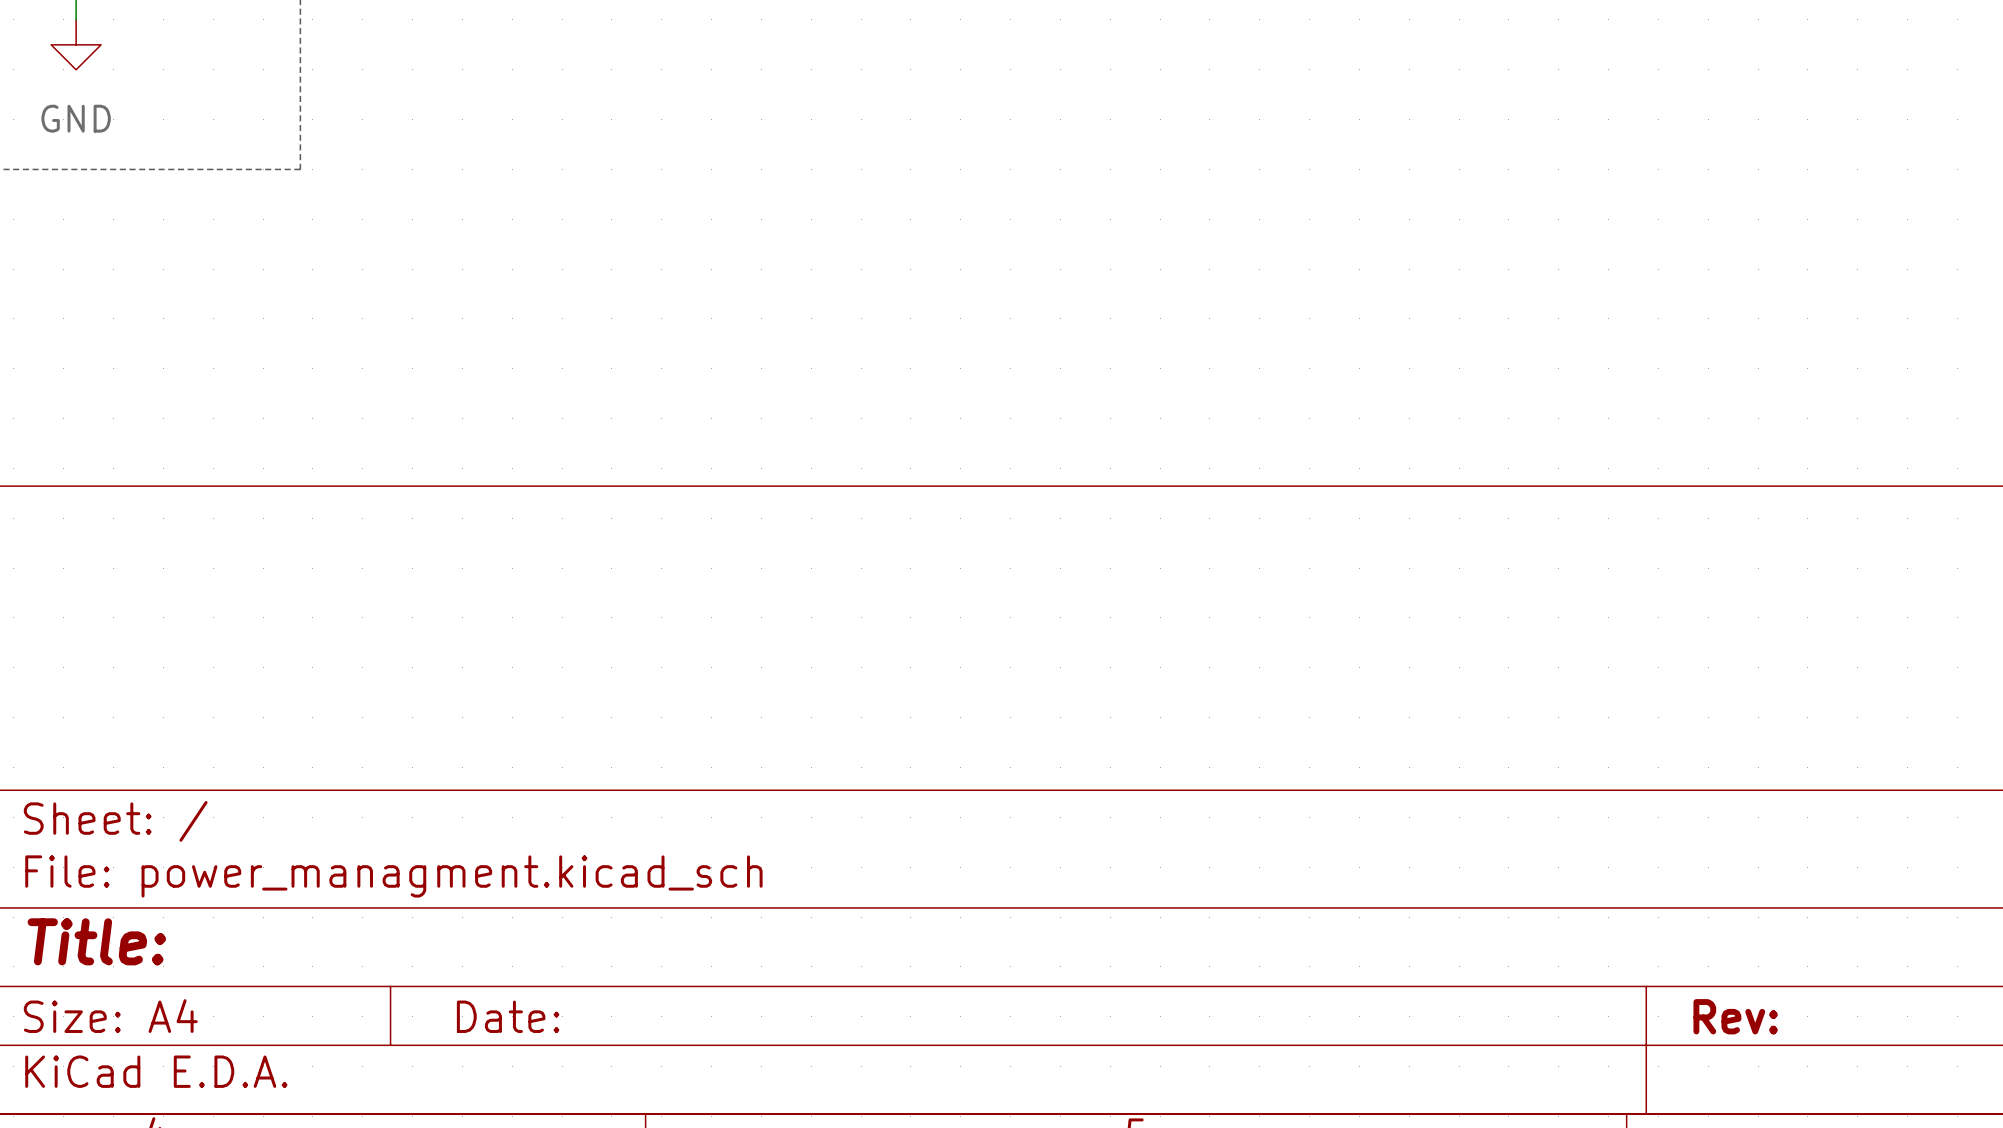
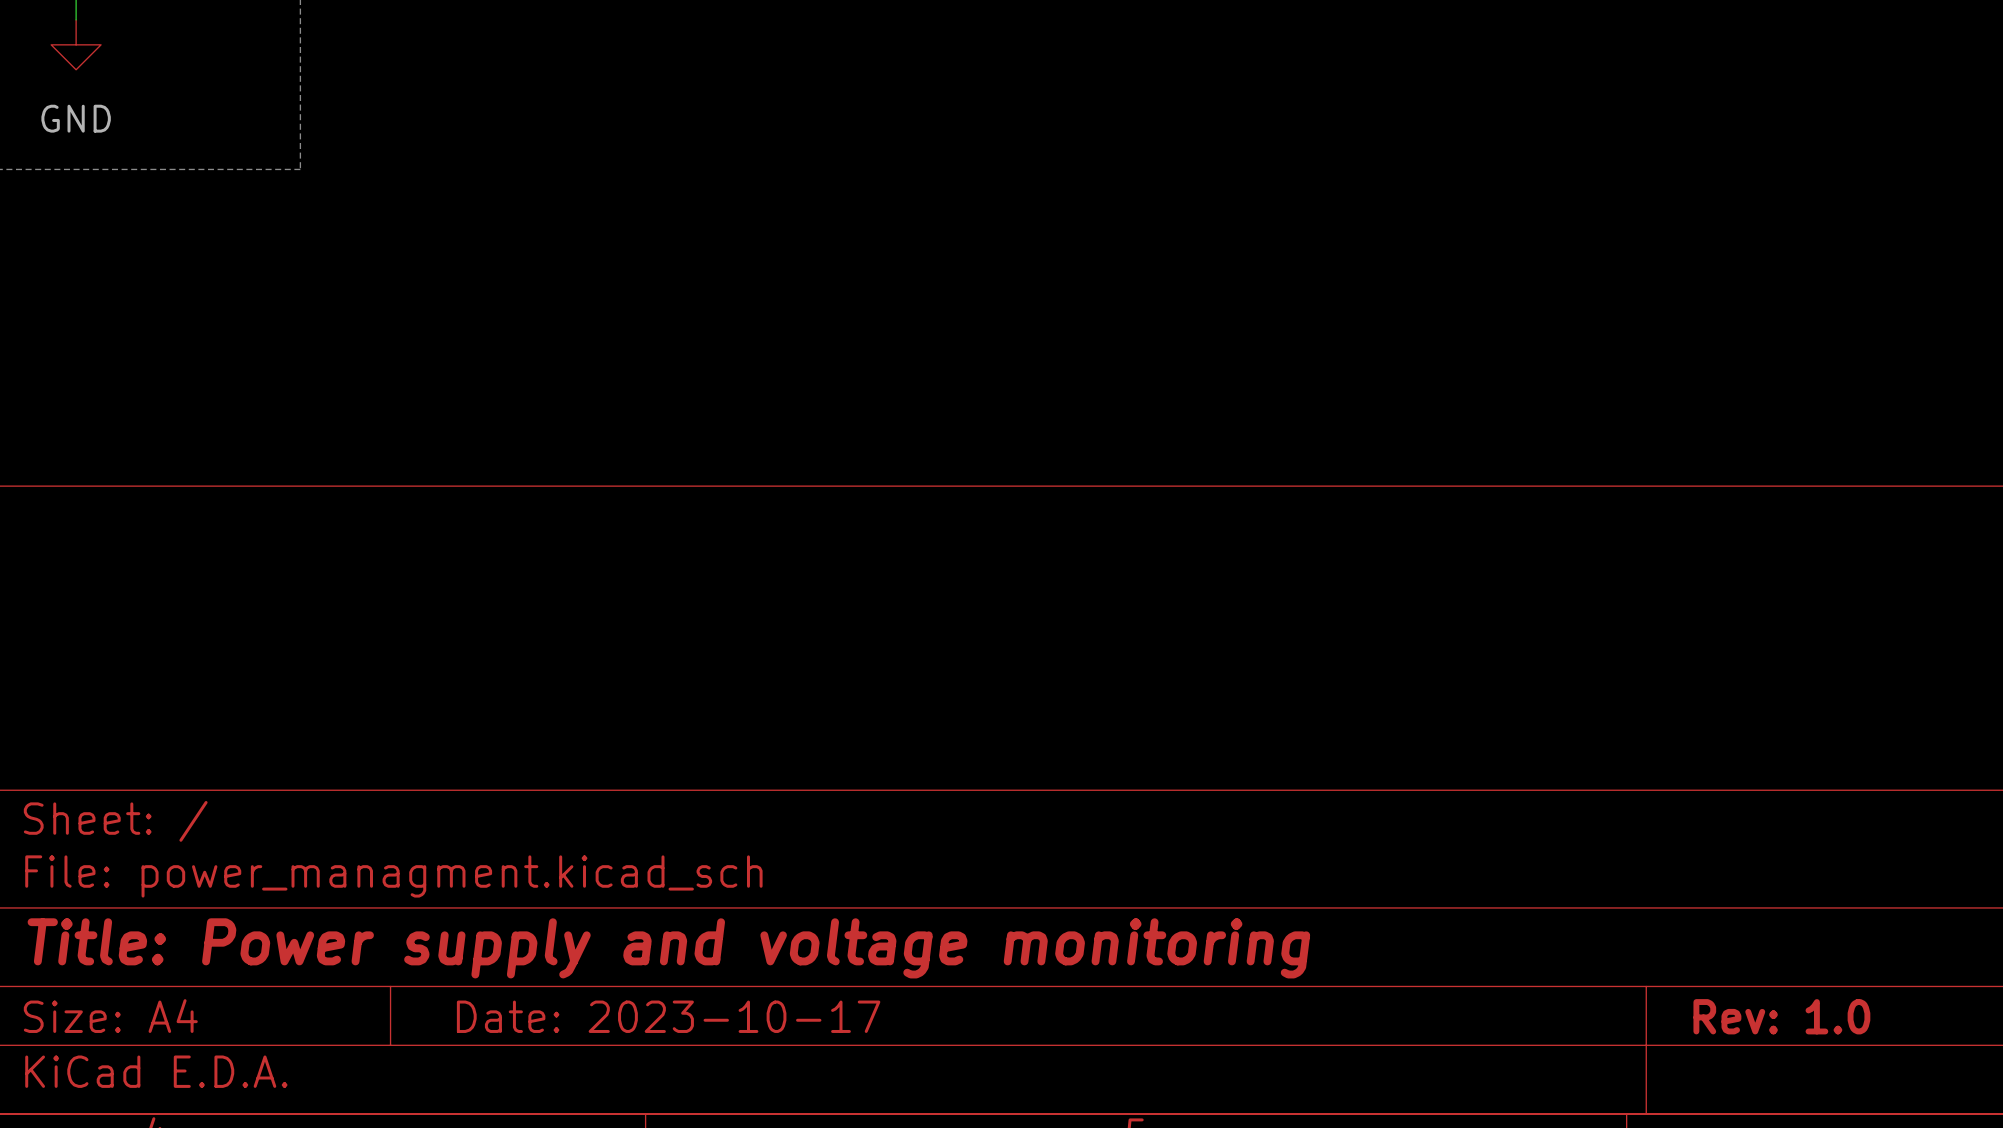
title block: Title: (96, 941) -> Title: Power supply and voltage monitoring (668, 948)
title block: Date: (508, 1016) -> Date: 2023-10-17 (668, 1016)
title block: Rev: (1735, 1016) -> Rev: 1.0 (1781, 1016)

